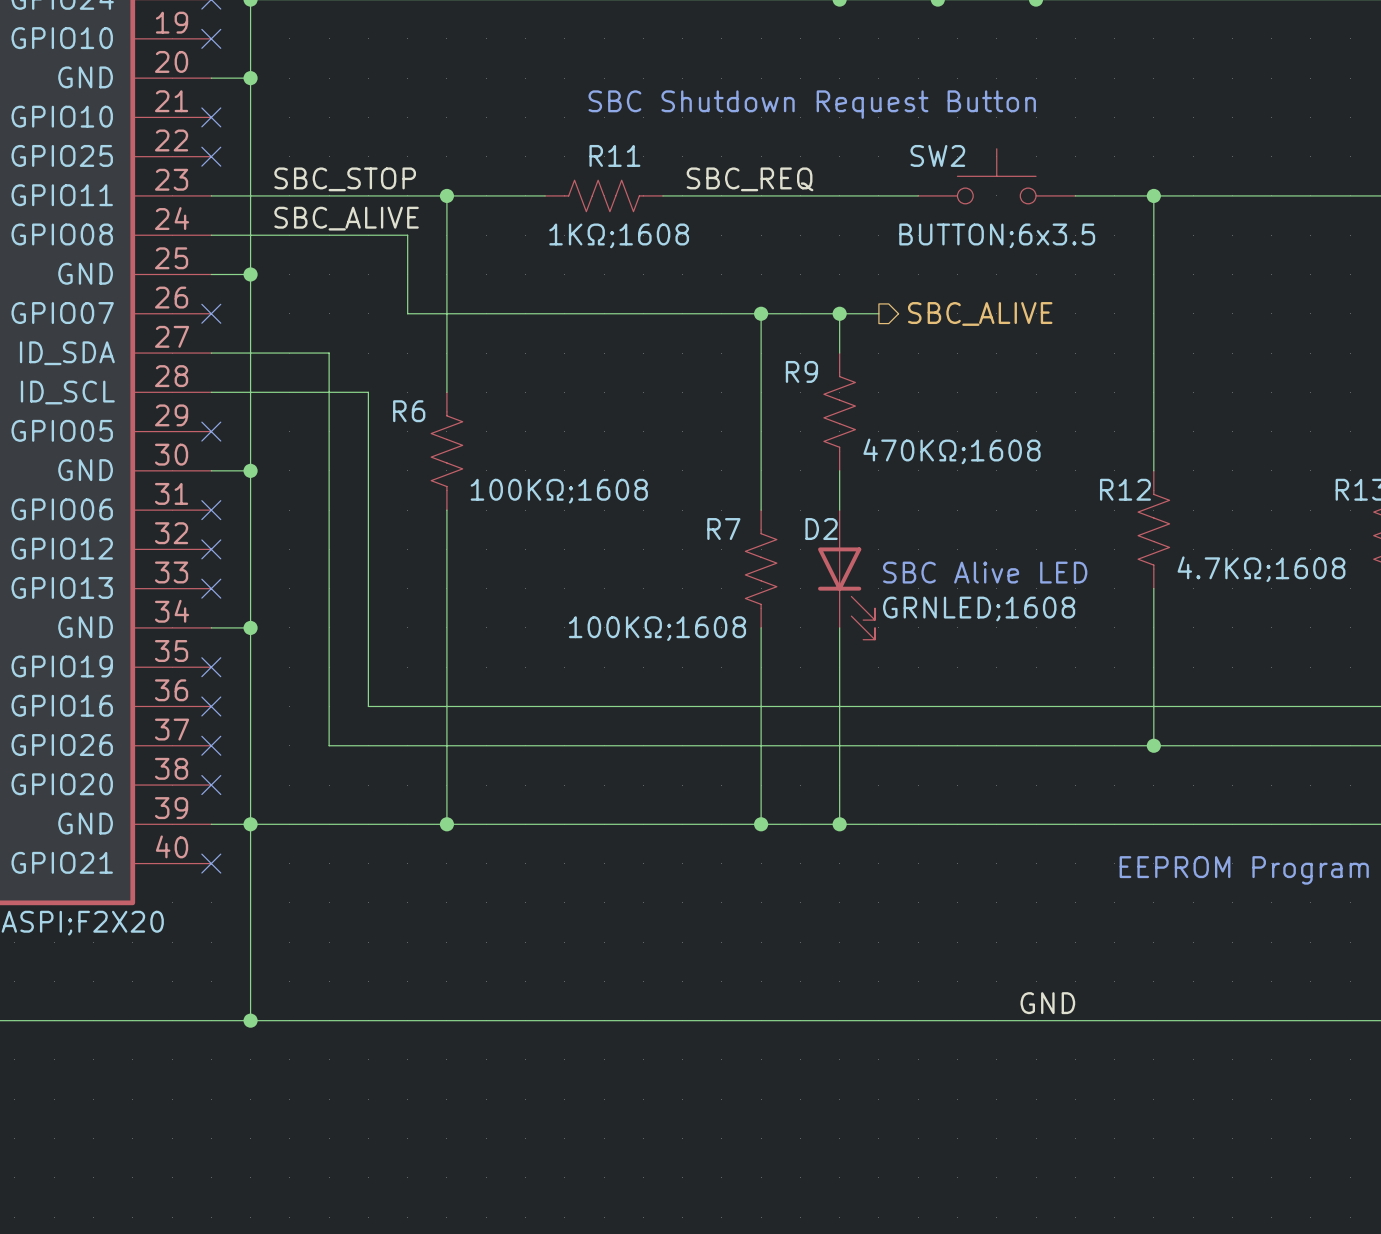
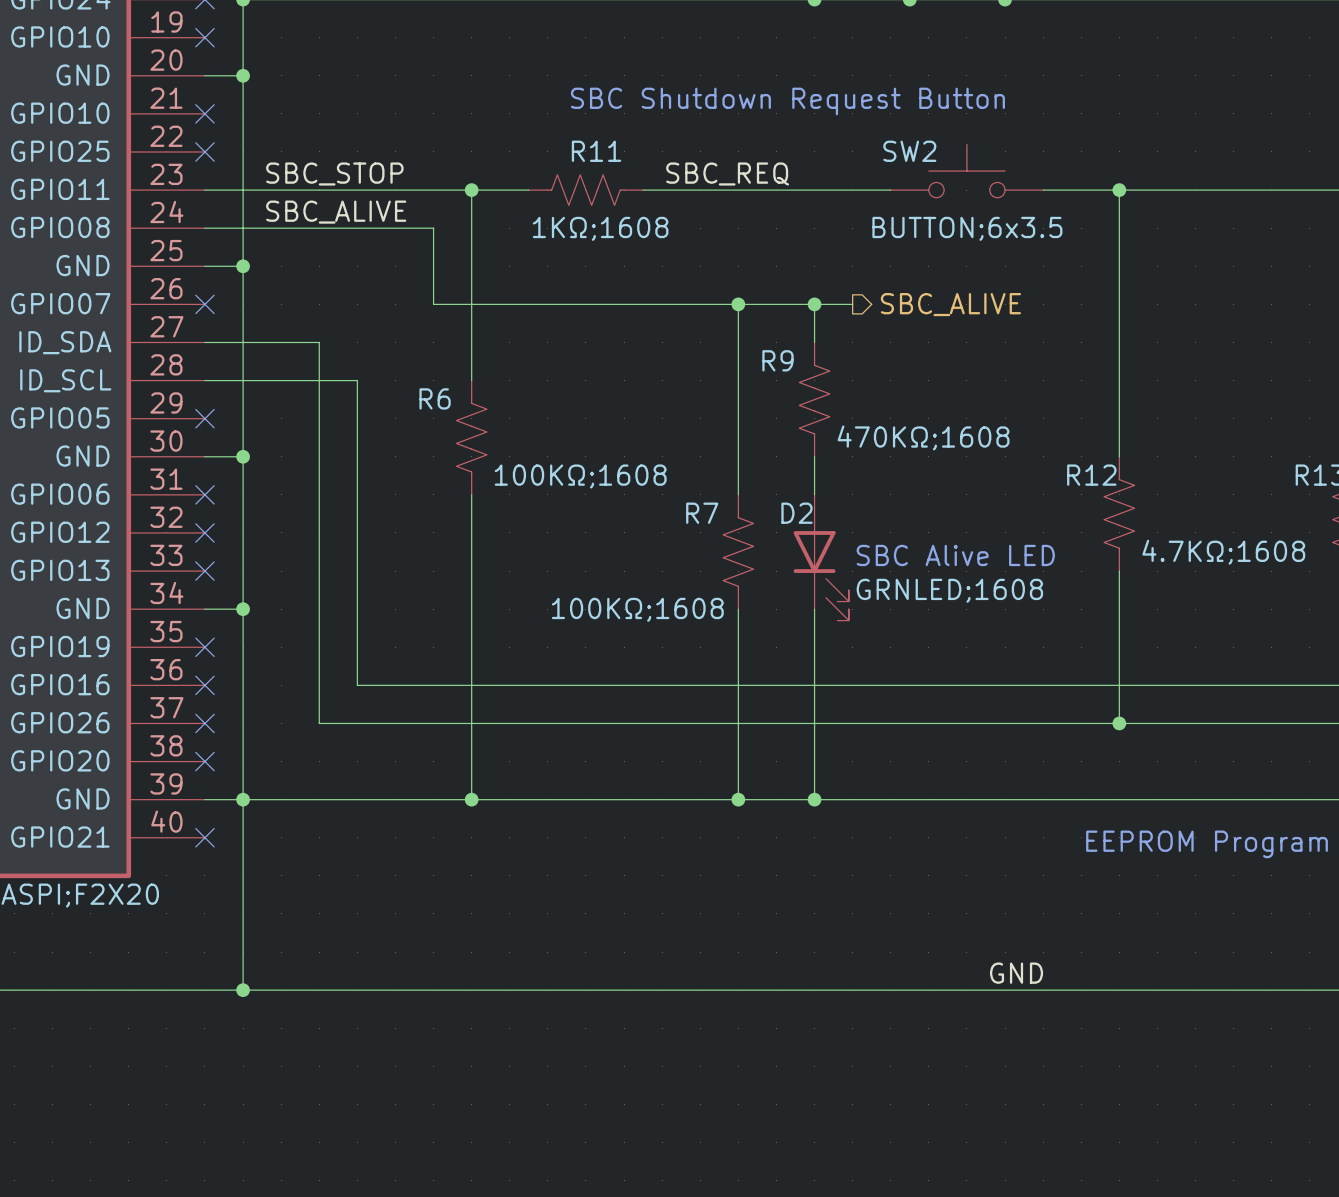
wire: (446, 195) (446, 235) -> (395, 228) (433, 228)
junction position: (446, 195) -> (471, 190)
wire: none -> (471, 190) (471, 380)
wire: (407, 235) (407, 313) (446, 313) (446, 392) -> none
R6 position: (446, 451) -> (471, 437)
wire: (446, 510) (446, 824) -> (471, 494) (471, 799)
junction position: (446, 824) -> (471, 799)

